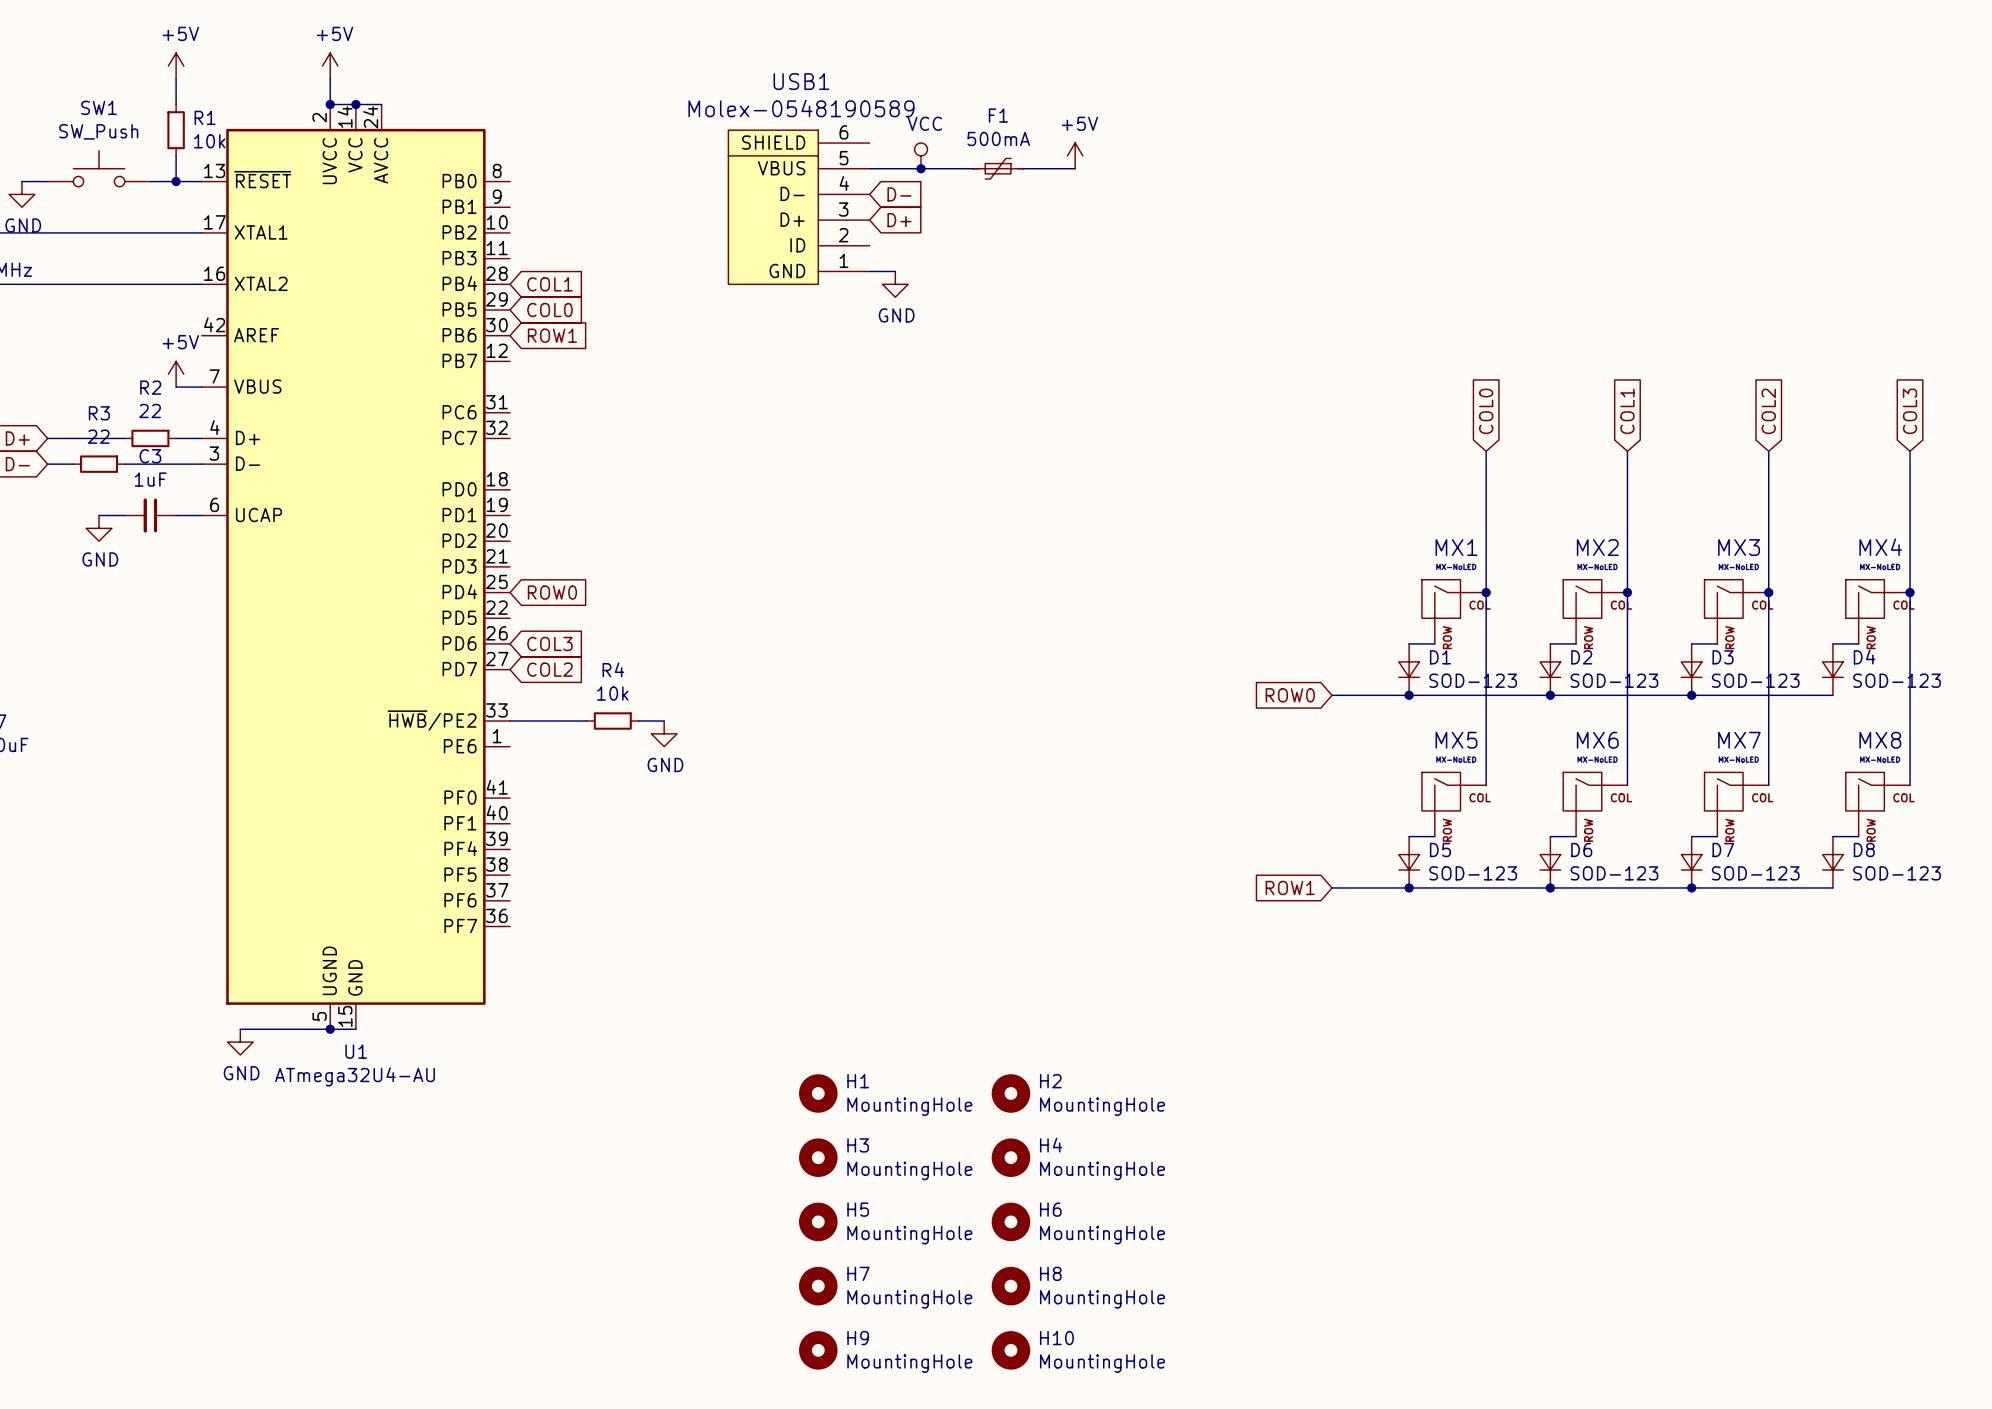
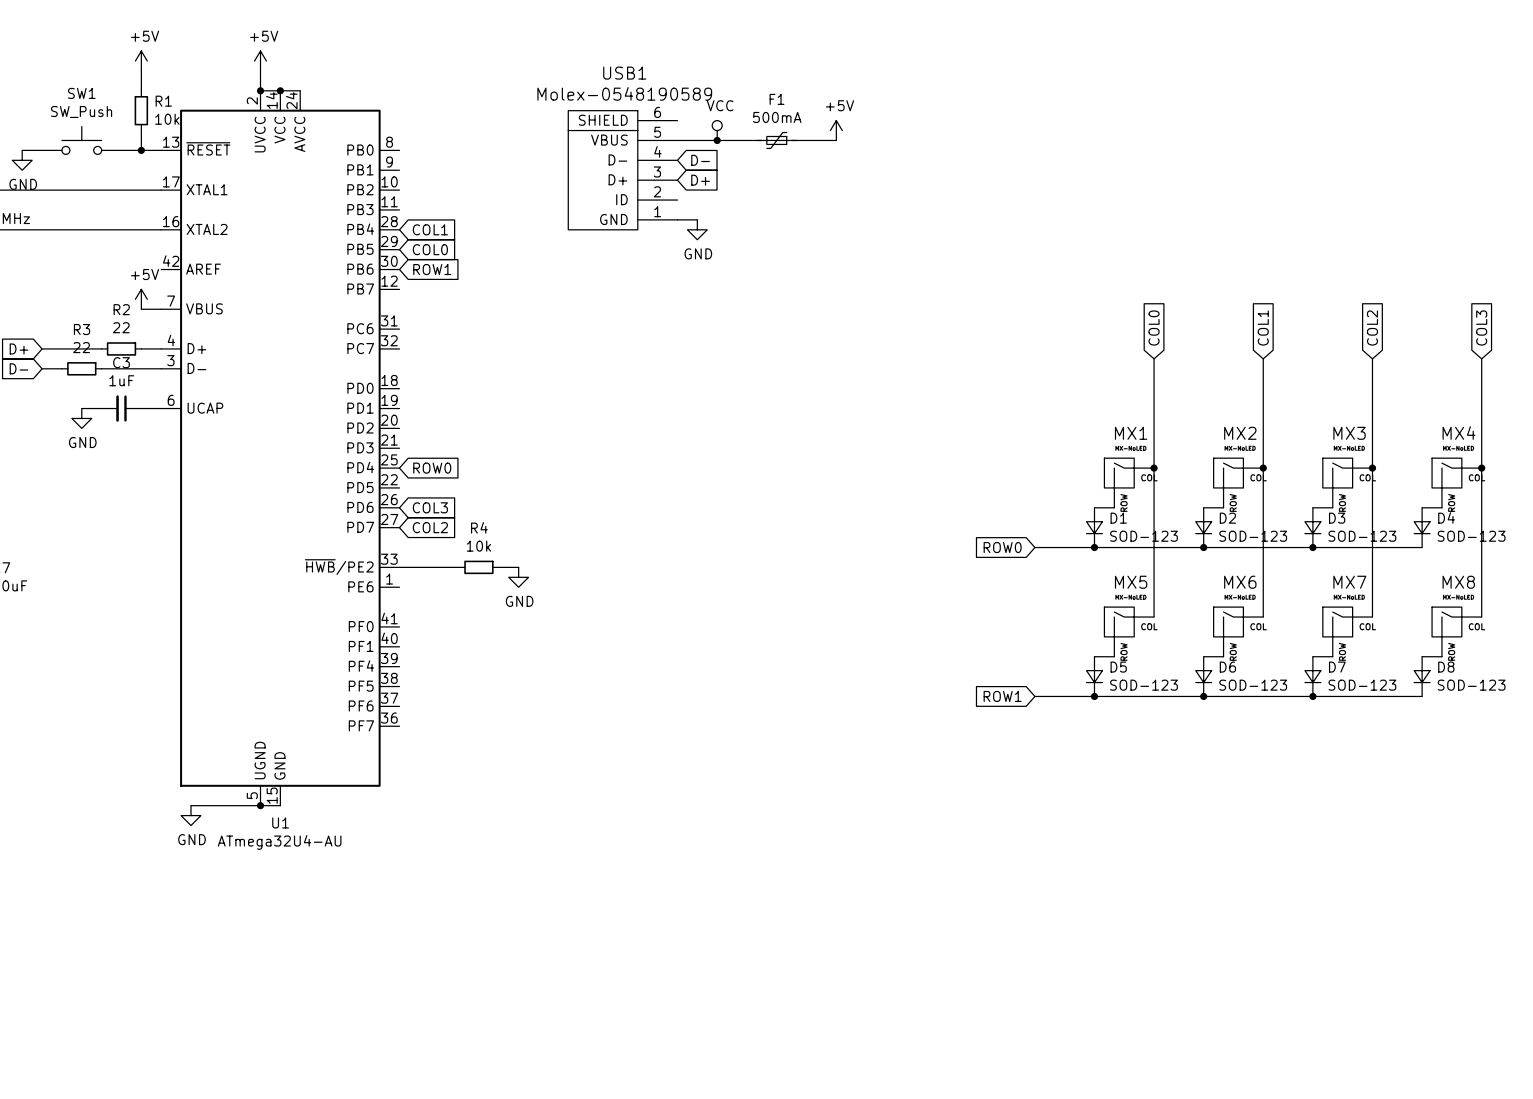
H1: MountingHole (818, 1093) -> none
H2: MountingHole (1010, 1093) -> none
H3: MountingHole (818, 1157) -> none
H4: MountingHole (1010, 1157) -> none
H5: MountingHole (818, 1221) -> none
H6: MountingHole (1010, 1221) -> none
H7: MountingHole (818, 1286) -> none
H8: MountingHole (1010, 1286) -> none
H9: MountingHole (818, 1350) -> none
H10: MountingHole (1010, 1350) -> none

